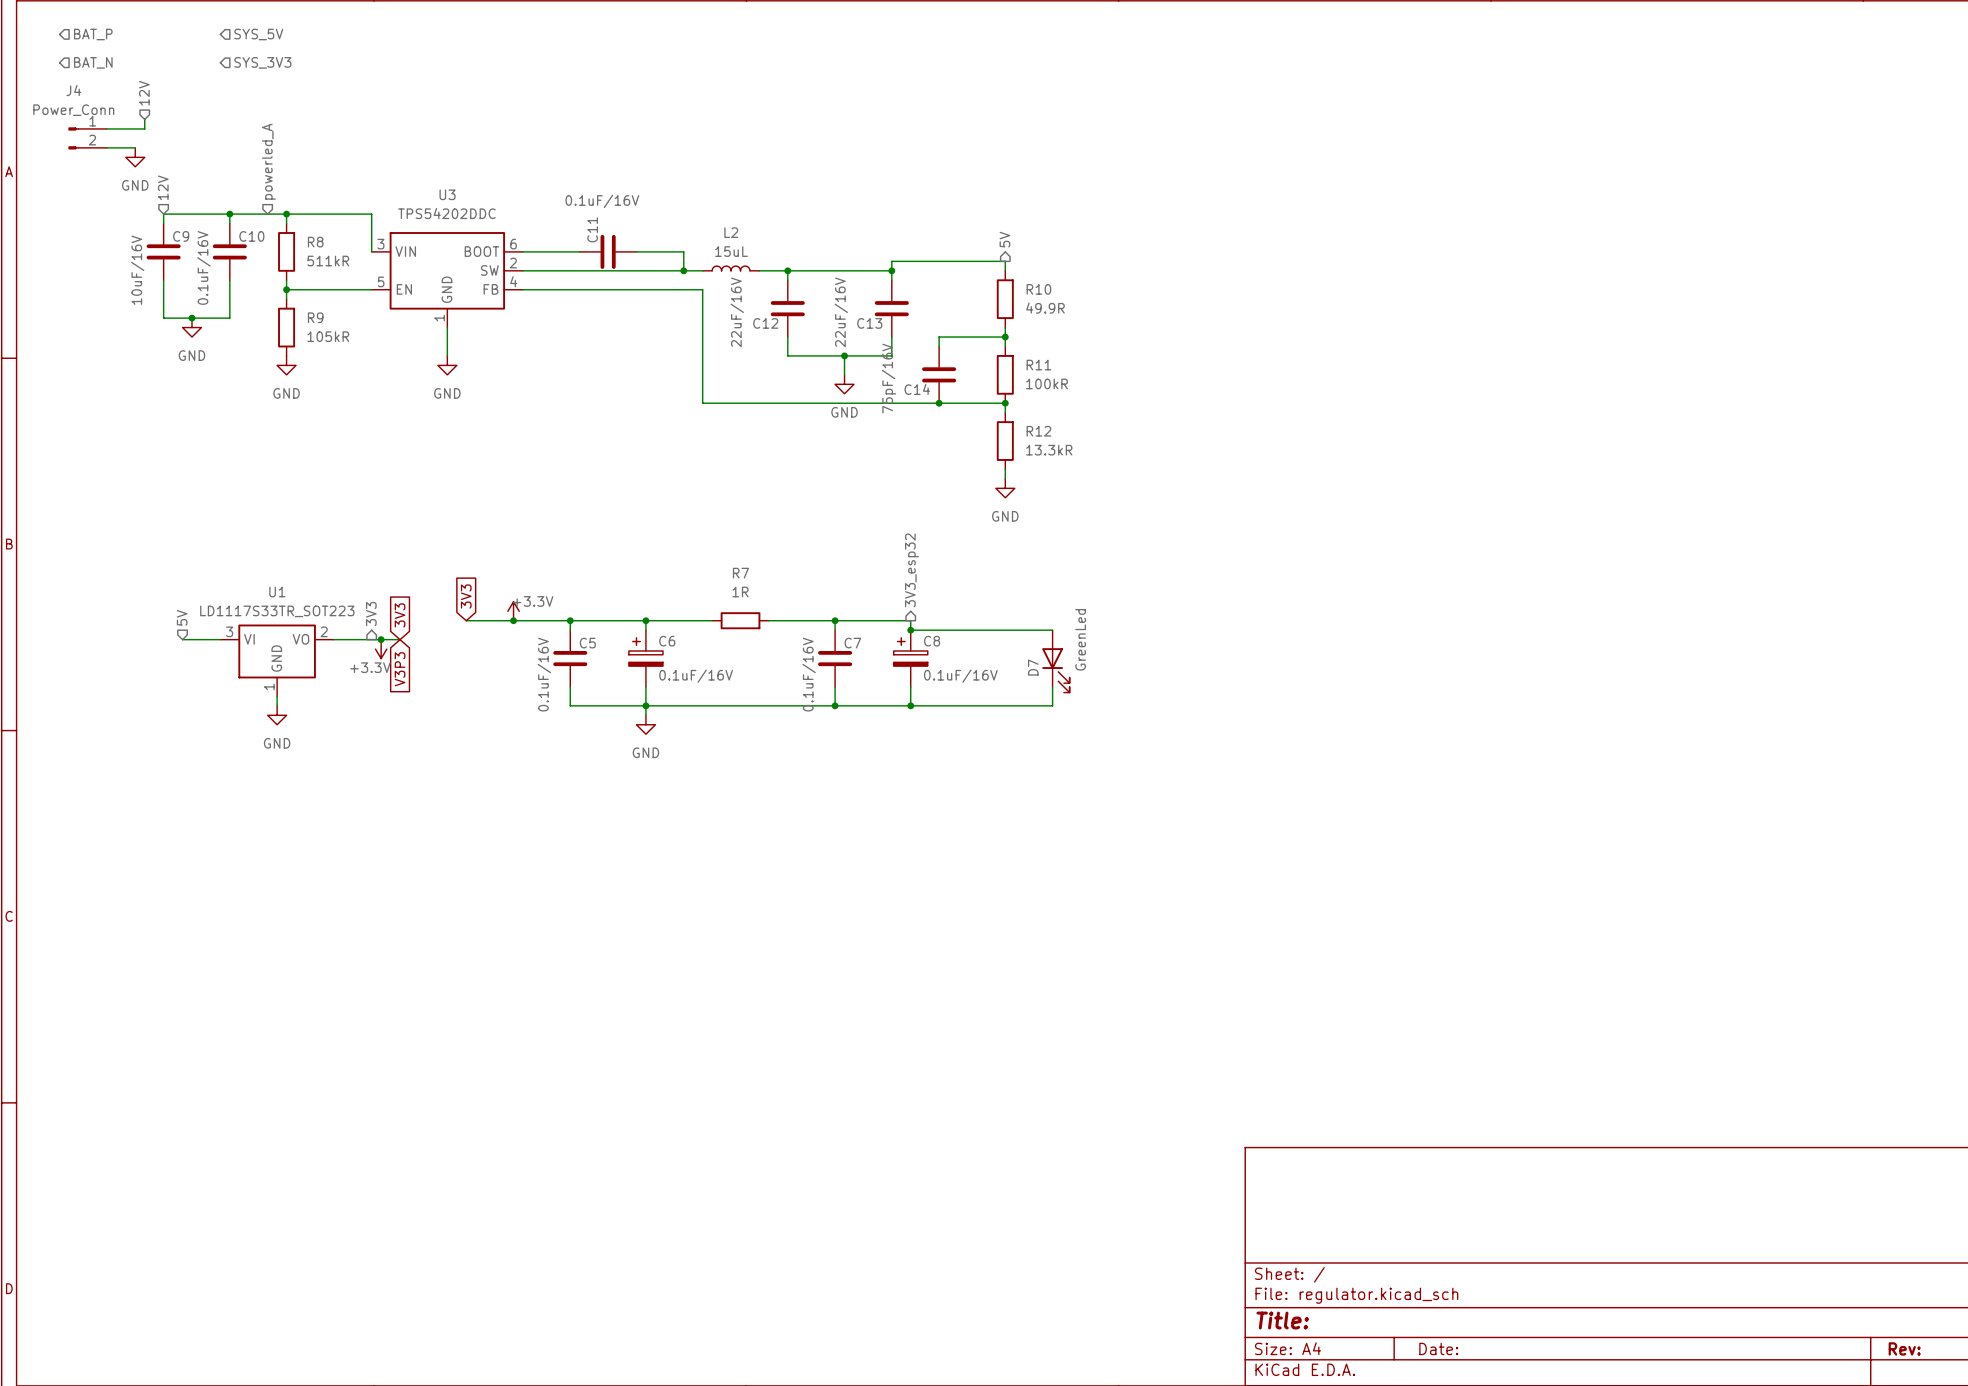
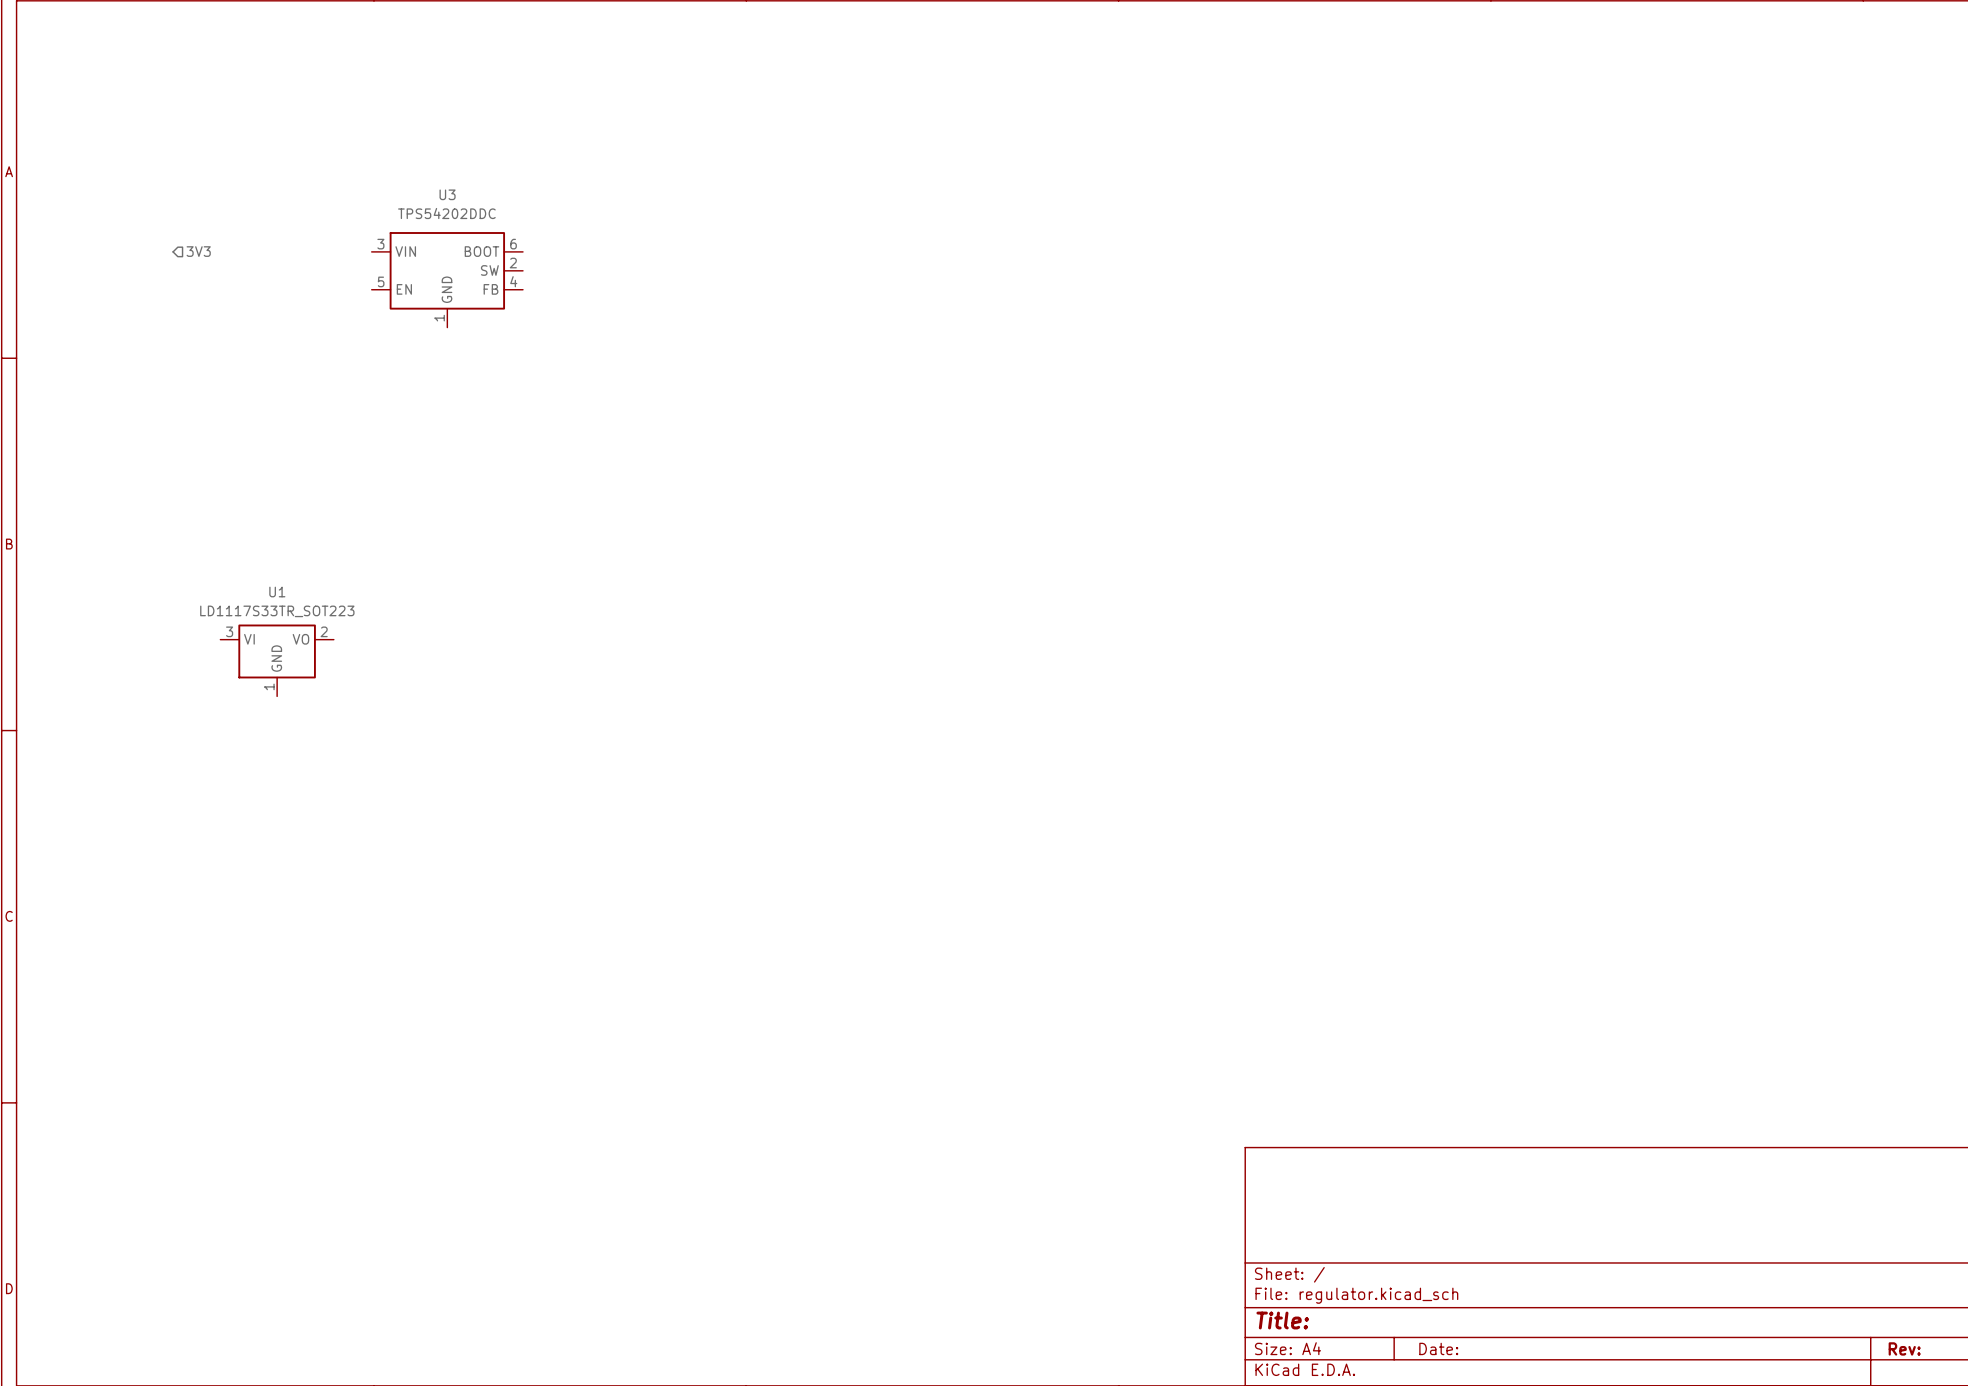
hierarchical label: BAT_P (93, 34) -> none
hierarchical label: SYS_5V (258, 34) -> none
hierarchical label: BAT_N (93, 62) -> none
hierarchical label: SYS_3V3 (262, 62) -> none
hierarchical label: 12V (144, 93) -> none
wire: (144, 119) (144, 128) (106, 128) -> none
J4: Power_Conn (87, 138) -> none
wire: (106, 147) (135, 147) -> none
power symbol: GND (135, 157) -> none
hierarchical label: powerled_A (268, 161) -> none
hierarchical label: 12V (163, 187) -> none
wire: (229, 214) (229, 223) -> none
junction: (229, 214) -> none
wire: (286, 214) (286, 223) -> none
junction: (286, 214) -> none
wire: (163, 223) (163, 214) (371, 214) (371, 251) -> none
hierarchical label: 5V (1004, 239) -> none
C9: 10uF/16V (163, 251) -> none
hierarchical label: none -> 3V3 (198, 251)
C10: 0.1uF/16V (229, 251) -> none
R8: 511kR (286, 251) -> none
wire: (523, 251) (579, 251) -> none
C11: 0.1uF/16V (608, 251) -> none
wire: (636, 251) (683, 251) (683, 270) -> none
L2: 15uL (731, 268) -> none
wire: (523, 270) (702, 270) -> none
junction: (683, 270) -> none
wire: (759, 270) (891, 270) -> none
wire: (787, 270) (787, 280) -> none
junction: (787, 270) -> none
junction: (891, 270) -> none
wire: (1005, 270) (1005, 261) (891, 261) (891, 280) -> none
wire: (163, 280) (163, 318) (229, 318) (229, 280) -> none
wire: (286, 280) (286, 299) -> none
wire: (286, 289) (371, 289) -> none
junction: (286, 289) -> none
wire: (523, 289) (702, 289) (702, 403) (1005, 403) (1005, 412) -> none
R10: 49.9R (1005, 299) -> none
C12: 22uF/16V (787, 308) -> none
C13: 22uF/16V (891, 308) -> none
junction: (192, 318) -> none
power symbol: GND (192, 327) -> none
R9: 105kR (286, 327) -> none
wire: (447, 327) (447, 355) -> none
wire: (1005, 327) (1005, 346) -> none
wire: (787, 337) (787, 355) (891, 355) (891, 337) -> none
wire: (1005, 337) (939, 337) (939, 346) -> none
junction: (1005, 337) -> none
wire: (844, 355) (844, 374) -> none
junction: (844, 355) -> none
power symbol: GND (286, 365) -> none
power symbol: GND (447, 365) -> none
C14: 75pF/16V (939, 374) -> none
R11: 100kR (1005, 374) -> none
power symbol: GND (844, 384) -> none
junction: (939, 403) -> none
junction: (1005, 403) -> none
R12: 13.3kR (1005, 441) -> none
wire: (1005, 469) (1005, 478) -> none
power symbol: GND (1005, 488) -> none
hierarchical label: 3V3_esp32 (911, 570) -> none
global label: 3V3 (466, 596) -> none
power symbol: +3.3V (513, 611) -> none
hierarchical label: 3V3 (371, 614) -> none
global label: 3V3 (400, 615) -> none
hierarchical label: 5V (182, 617) -> none
wire: (466, 620) (712, 620) -> none
junction: (513, 620) -> none
wire: (570, 620) (570, 630) -> none
junction: (570, 620) -> none
wire: (645, 620) (645, 630) -> none
junction: (645, 620) -> none
R7: 1R (740, 620) -> none
wire: (768, 620) (910, 620) (910, 630) (1052, 630) -> none
wire: (835, 620) (835, 630) -> none
junction: (835, 620) -> none
junction: (910, 630) -> none
wire: (182, 639) (220, 639) -> none
wire: (333, 639) (400, 639) -> none
junction: (381, 639) -> none
power symbol: +3.3V (381, 649) -> none
C5: 0.1uF/16V (570, 658) -> none
C6: 0.1uF/16V (645, 658) -> none
C7: 0.1uF/16V (835, 658) -> none
C8: 0.1uF/16V (910, 658) -> none
D7: GreenLed (1055, 661) -> none
global label: V3P3 (400, 669) -> none
wire: (570, 686) (570, 705) (1052, 705) (1052, 686) -> none
wire: (645, 686) (645, 715) -> none
wire: (835, 686) (835, 705) -> none
wire: (910, 686) (910, 705) -> none
wire: (277, 696) (277, 705) -> none
junction: (645, 705) -> none
junction: (835, 705) -> none
junction: (910, 705) -> none
power symbol: GND (277, 715) -> none
power symbol: GND (645, 724) -> none

